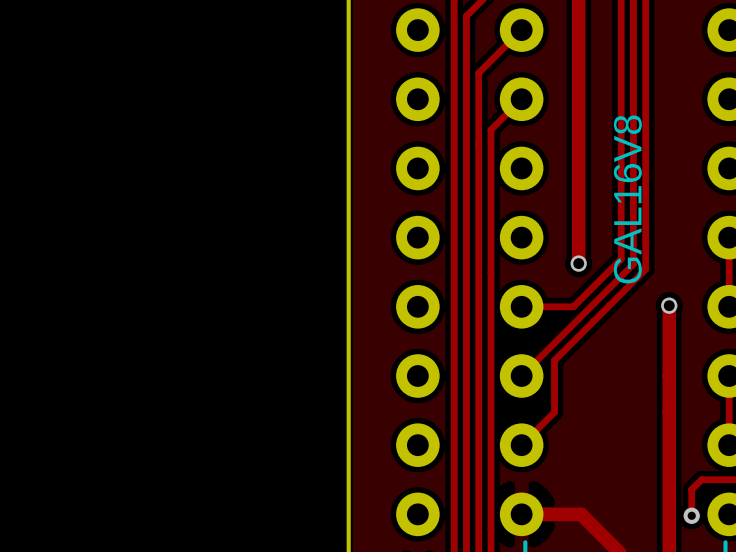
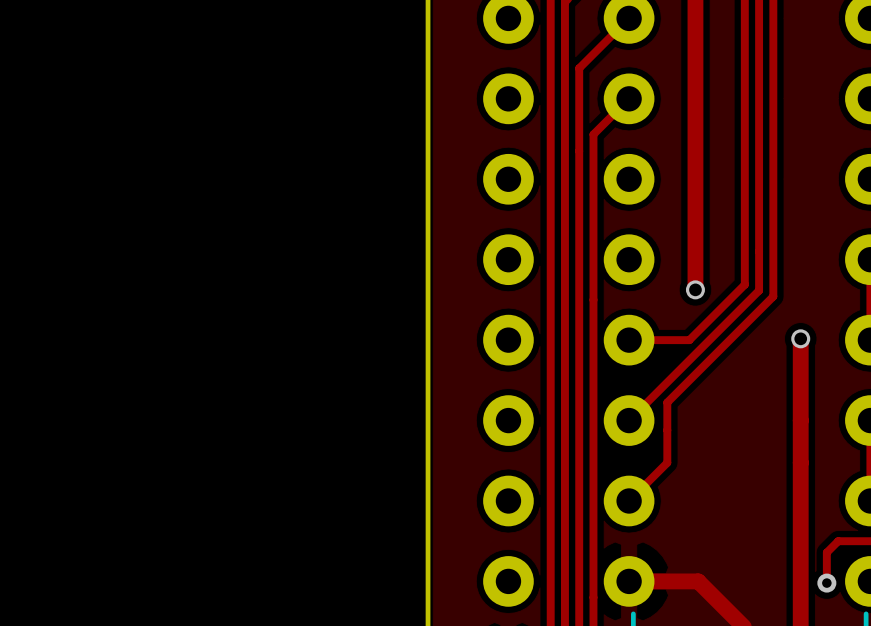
part value: GAL16V8 (627, 199) -> none

